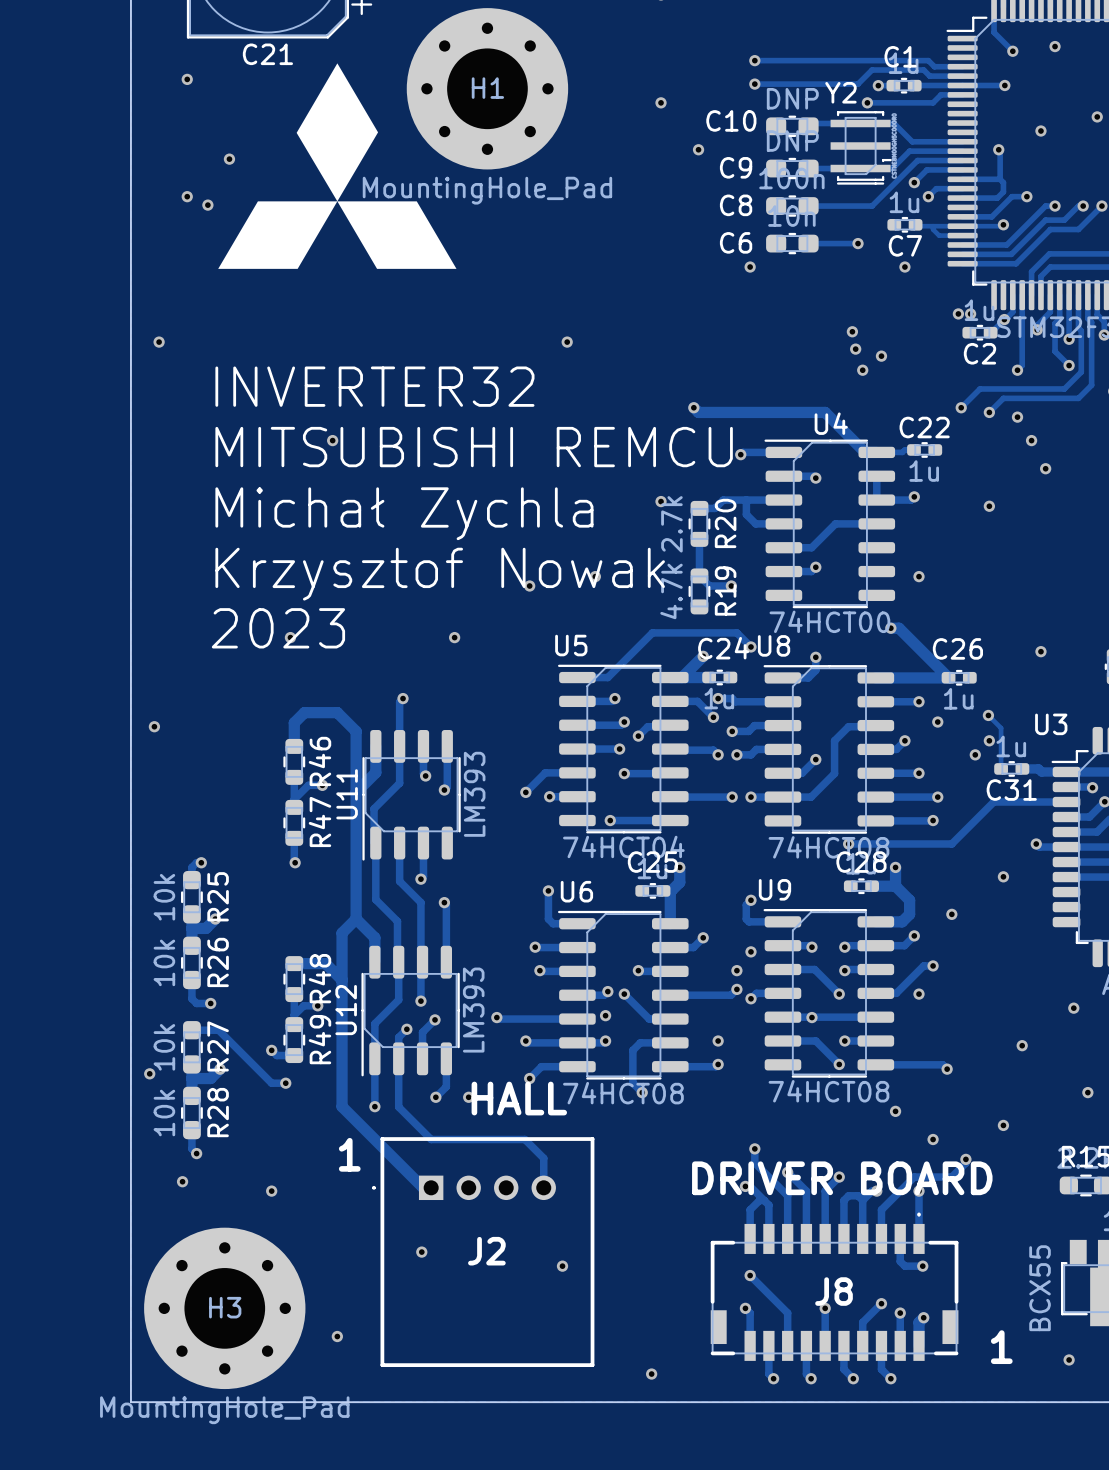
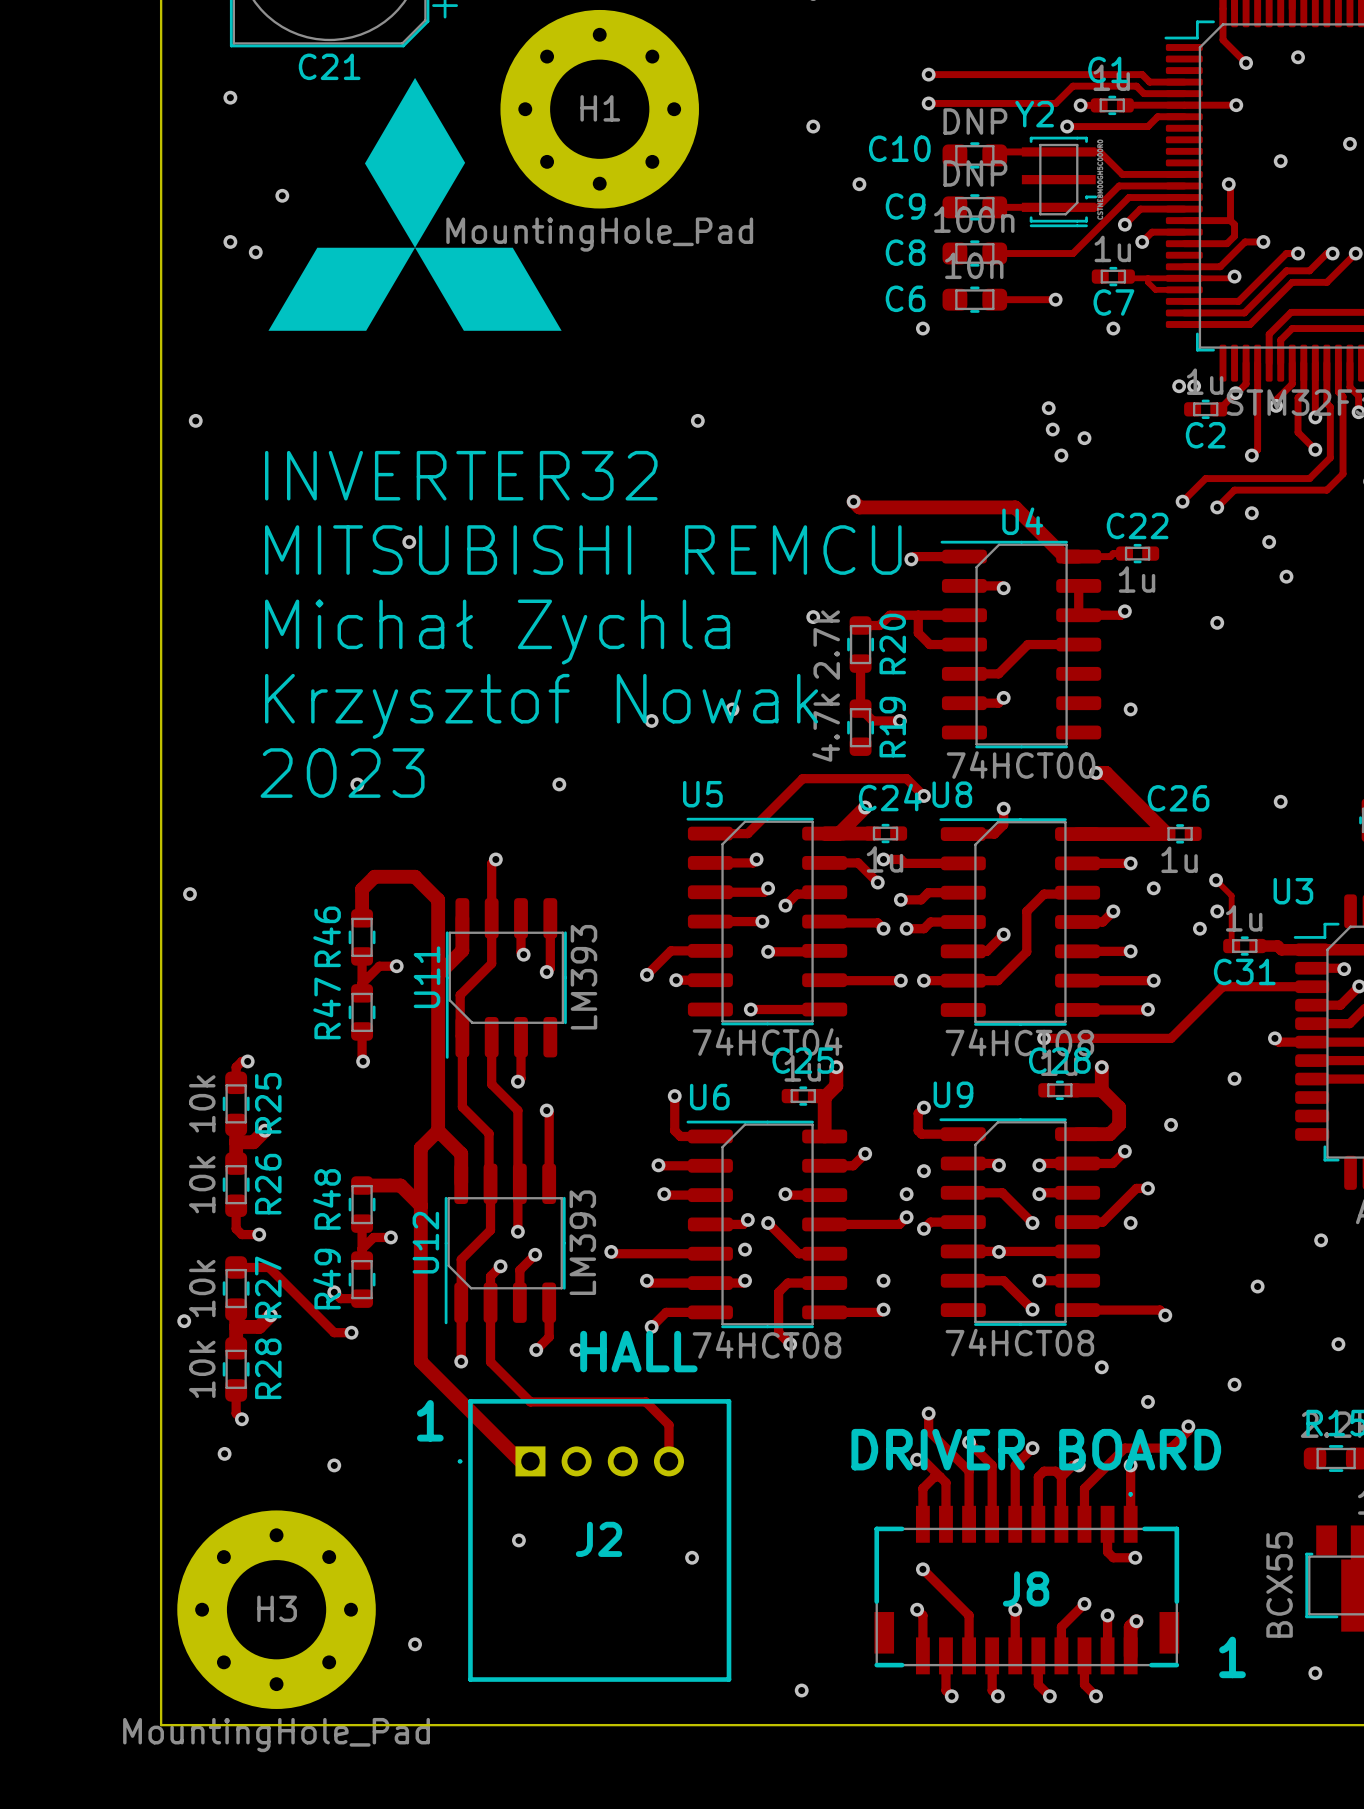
R46 name position: R46 (319, 761) -> R46 (327, 936)
R47 name position: R47 (319, 821) -> R47 (327, 1008)
R48 name position: R48 (319, 978) -> R48 (327, 1199)
R49 name position: R49 (319, 1039) -> R49 (327, 1279)

